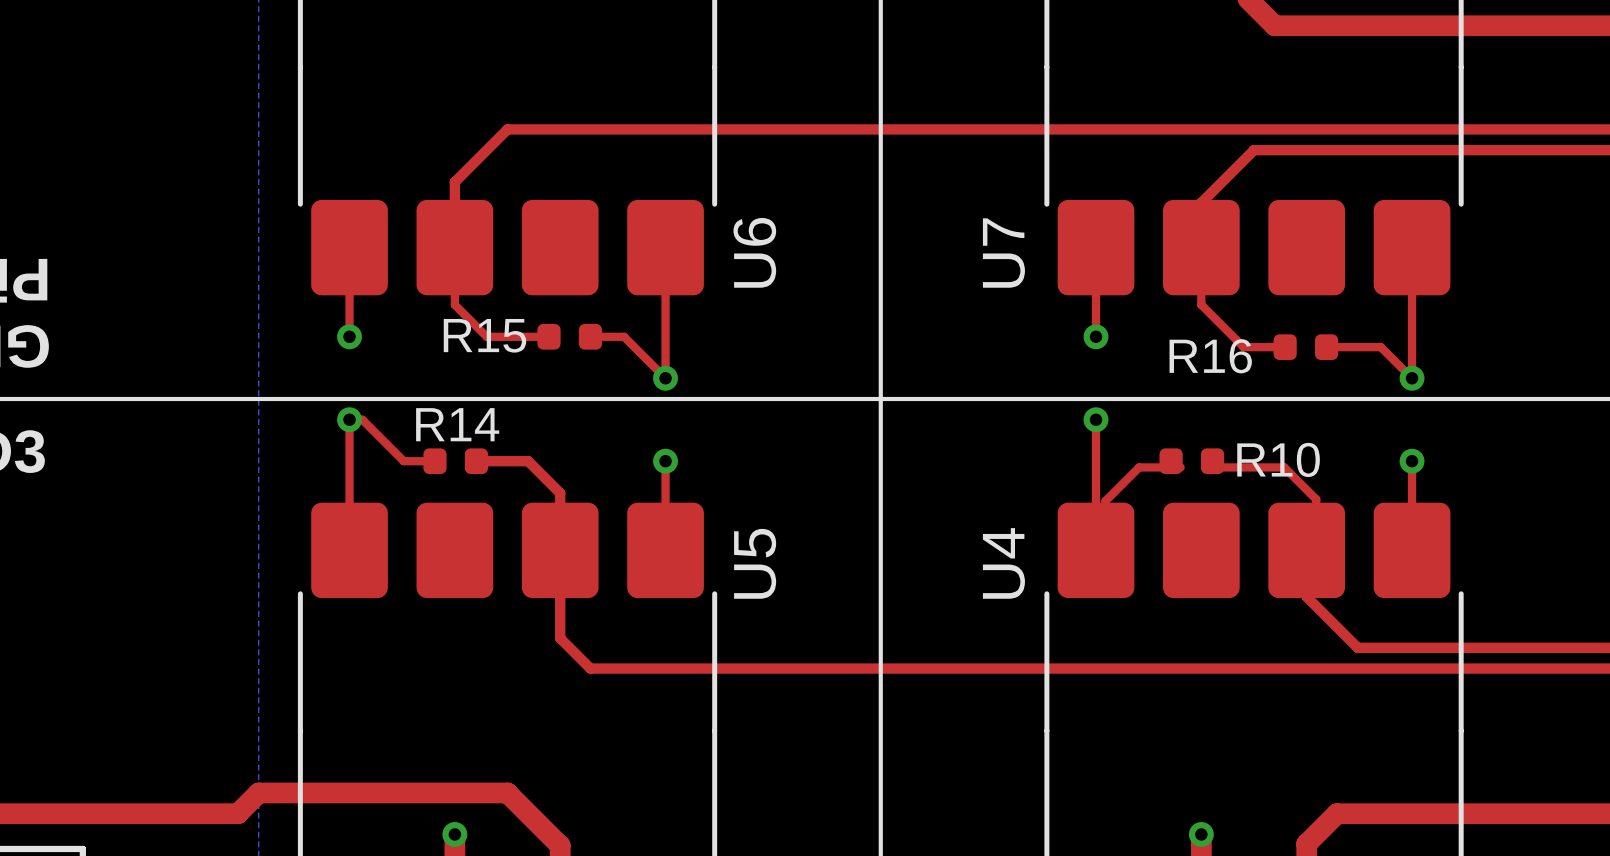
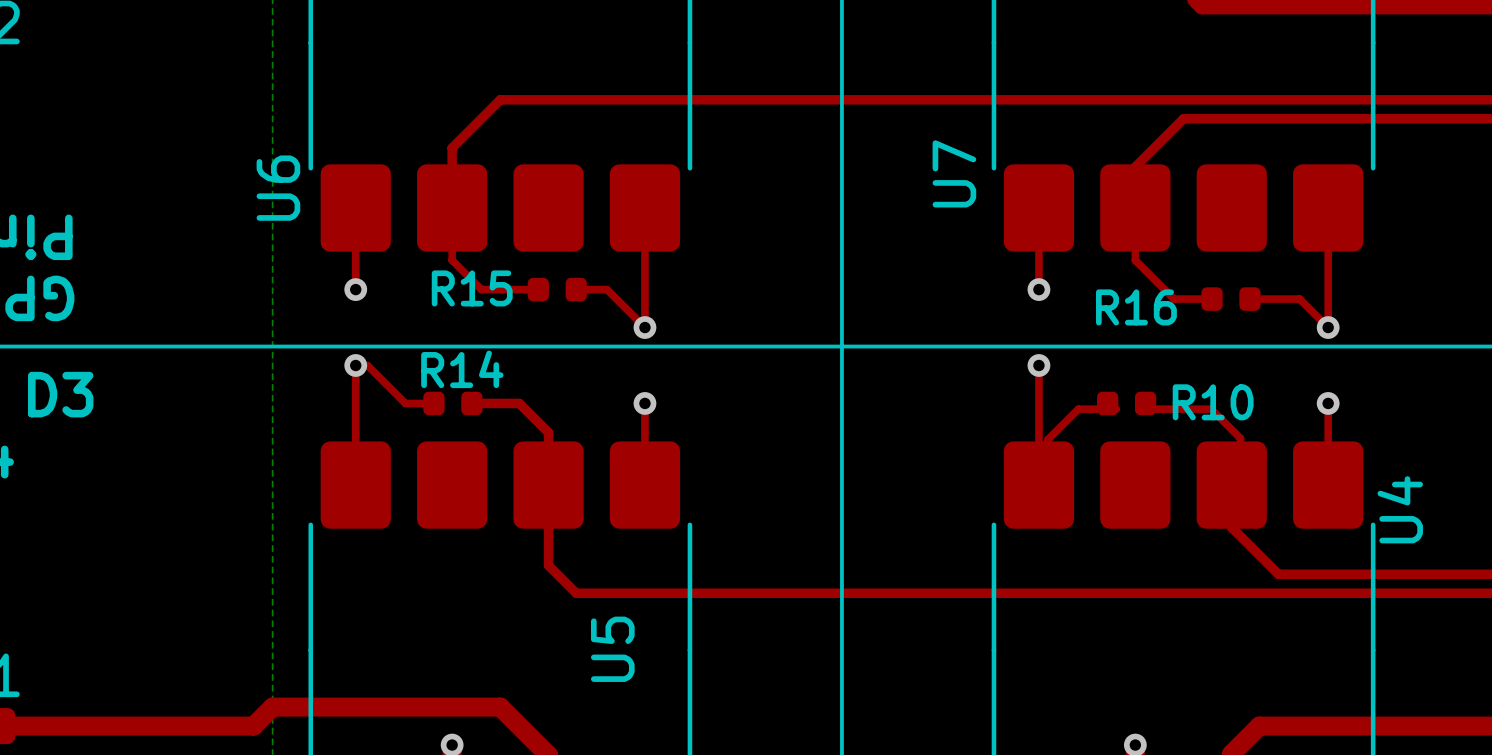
U6 name position: U6 (754, 252) -> U6 (278, 188)
U7 name position: U7 (1003, 253) -> U7 (954, 173)
U5 name position: U5 (755, 563) -> U5 (612, 649)
U4 name position: U4 (1003, 563) -> U4 (1400, 509)

